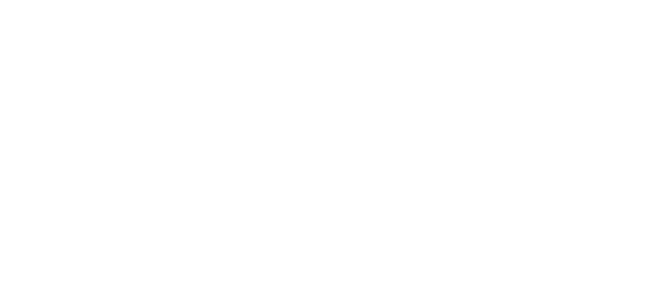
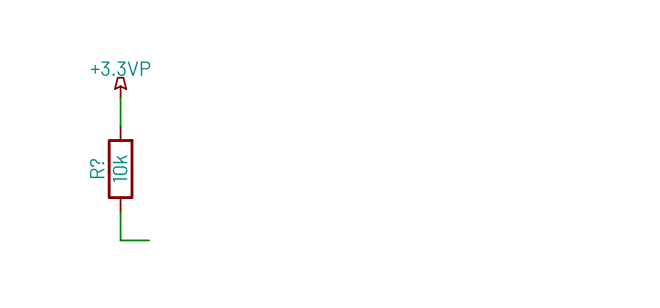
power symbol: none -> +3.3VP (120, 87)
wire: none -> (120, 97) (120, 126)
R?: none -> 10k (120, 169)
wire: none -> (120, 211) (120, 240) (149, 240)

